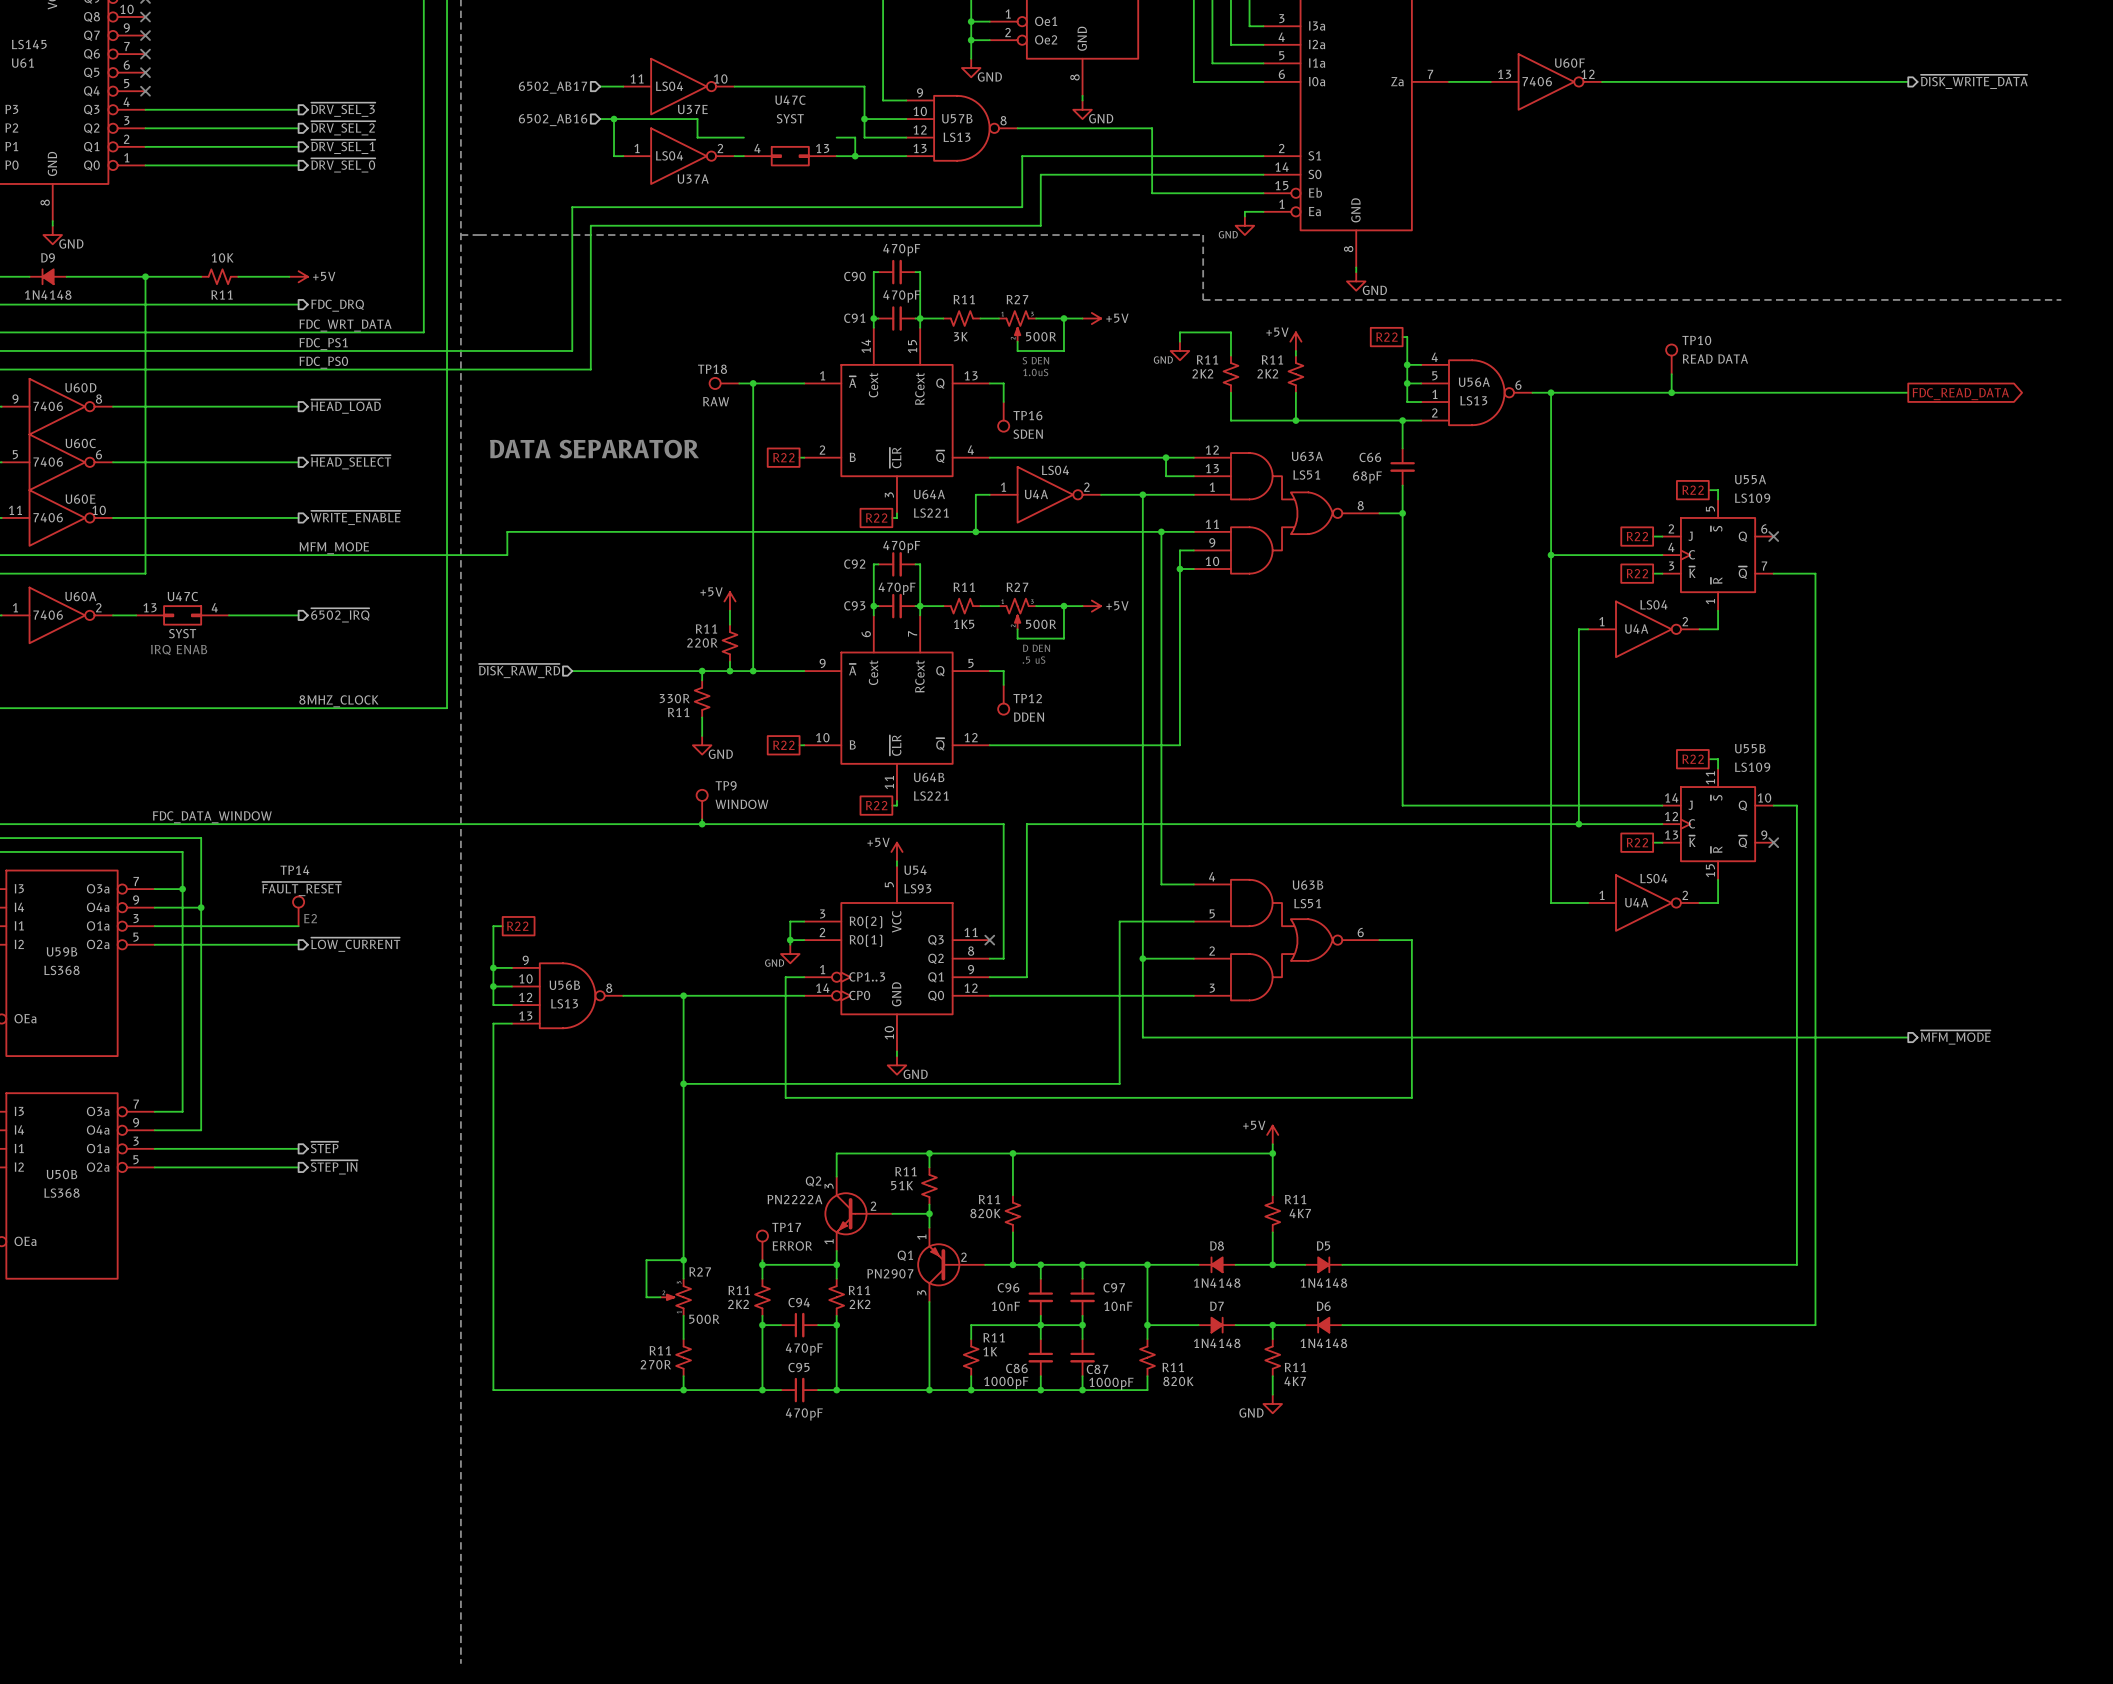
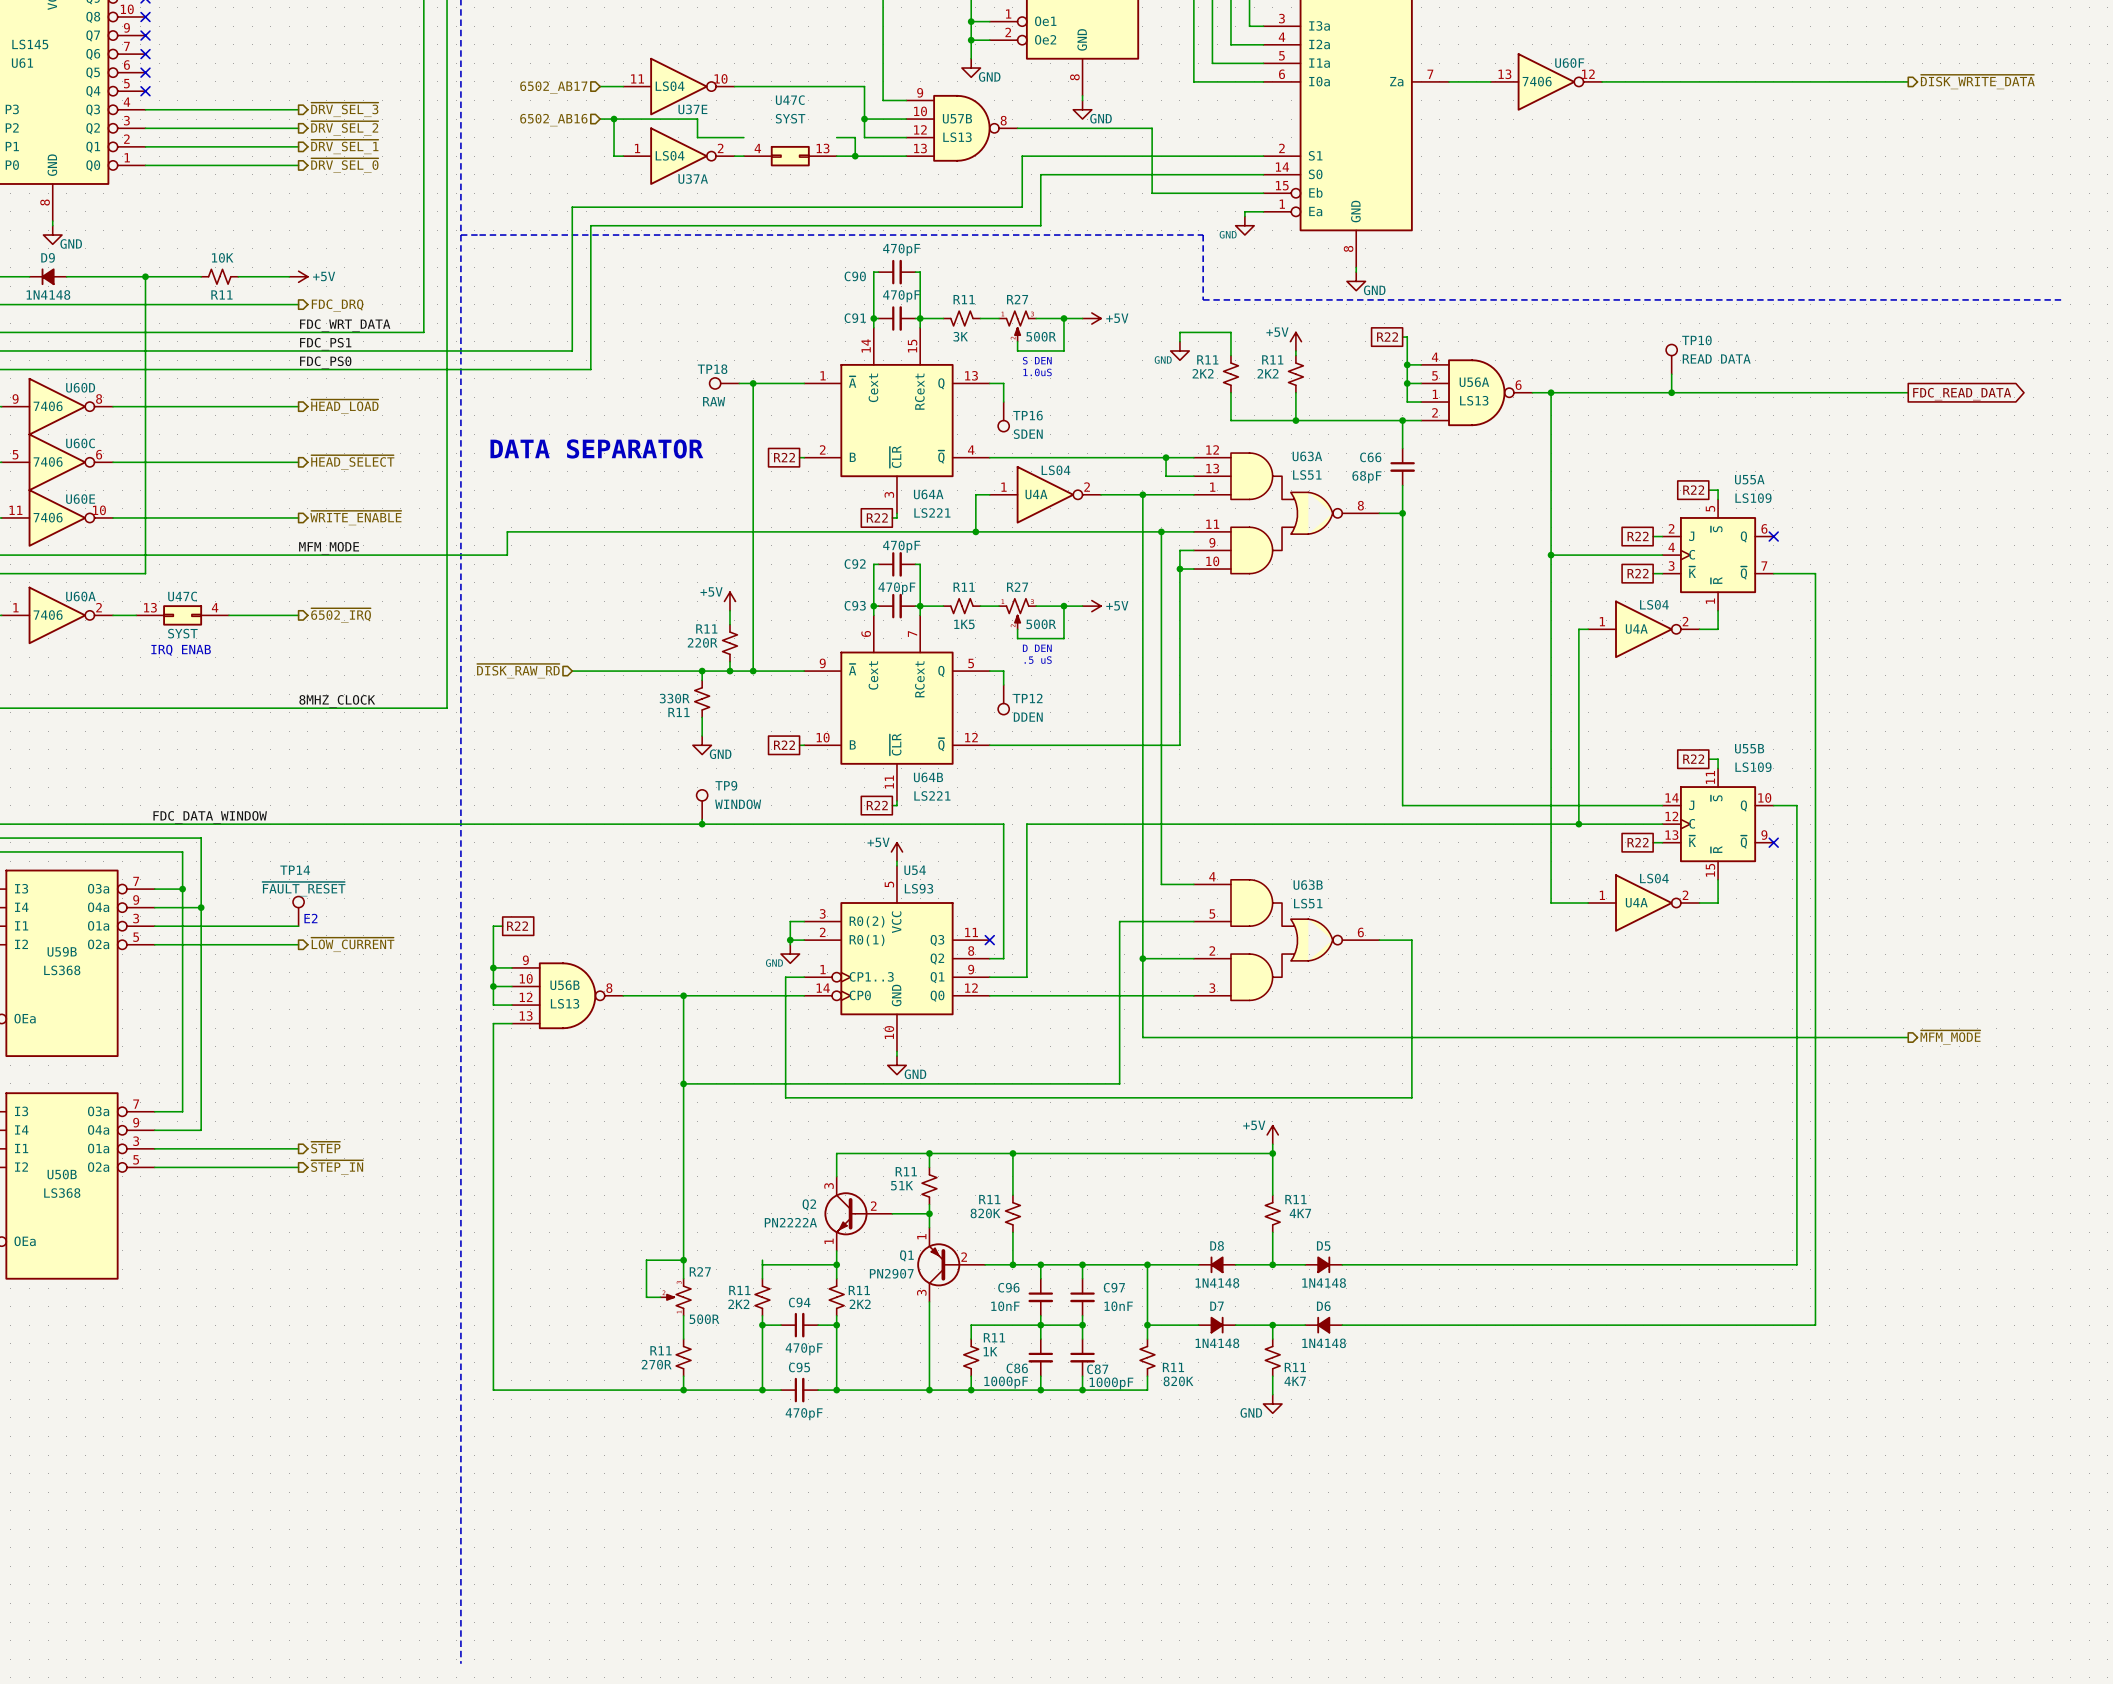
Q2 name position: Q2 (813, 1181) -> Q2 (809, 1204)
Q2 value position: PN2222A (794, 1199) -> PN2222A (790, 1222)
TP17: ERROR (762, 1245) -> none
junction: (762, 1264) -> none

